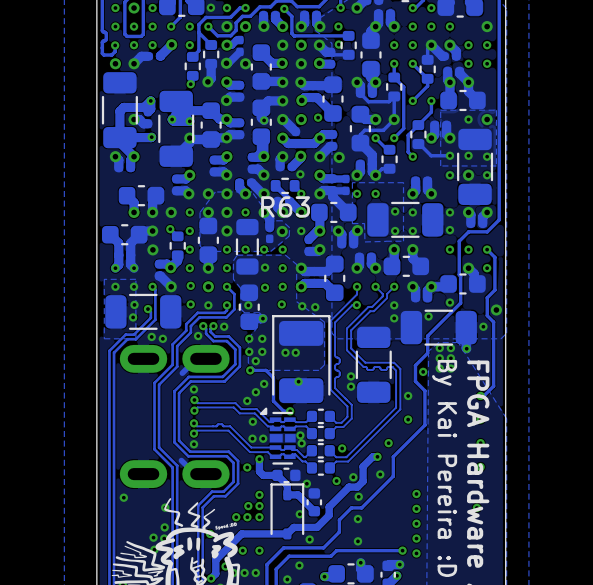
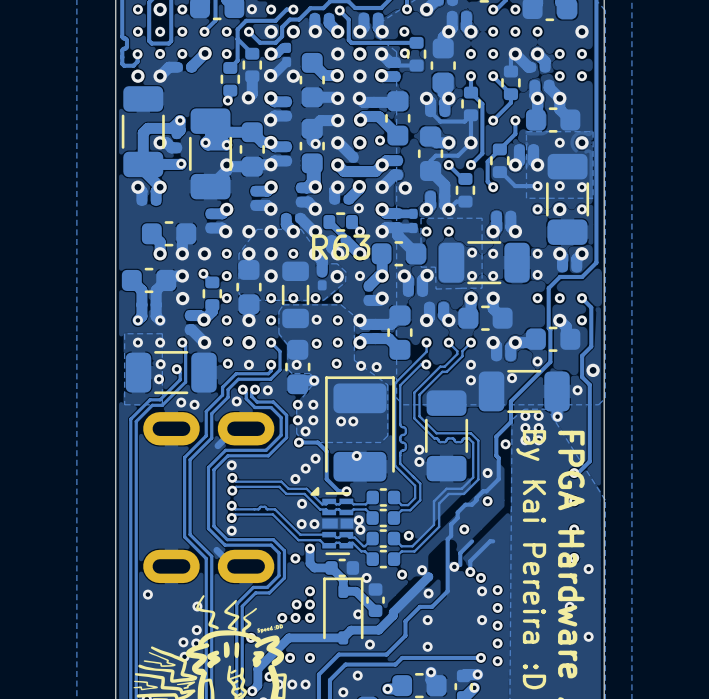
track: (417, 383) (424, 390) (424, 425) (393, 456) (393, 476) (374, 494) -> (498, 458) (498, 479) (486, 491) (483, 491) (472, 504) (465, 504) (457, 512) (457, 518) (451, 524) (451, 535) (447, 539) (447, 591)
track: (396, 399) (396, 407) (345, 457) -> (473, 477) (461, 488) (446, 488) (433, 501) (433, 524) (412, 546)
track: (400, 401) (400, 409) (346, 461) -> (478, 479) (463, 493) (448, 493) (439, 503) (439, 526) (414, 551)
track: none -> (472, 541) (460, 553) (460, 565)
track: none -> (493, 541) (490, 541) (470, 561) (470, 572)
track: (377, 456) (372, 456) (363, 466) (363, 481) (357, 487) (349, 487) (329, 506) (329, 512) -> (428, 576) (393, 612)
via: (377, 456) -> none
via: none -> (588, 569)
via: none -> (470, 572)
via: none -> (480, 577)
via: none -> (482, 591)
via: none -> (482, 620)
via: none -> (588, 636)

